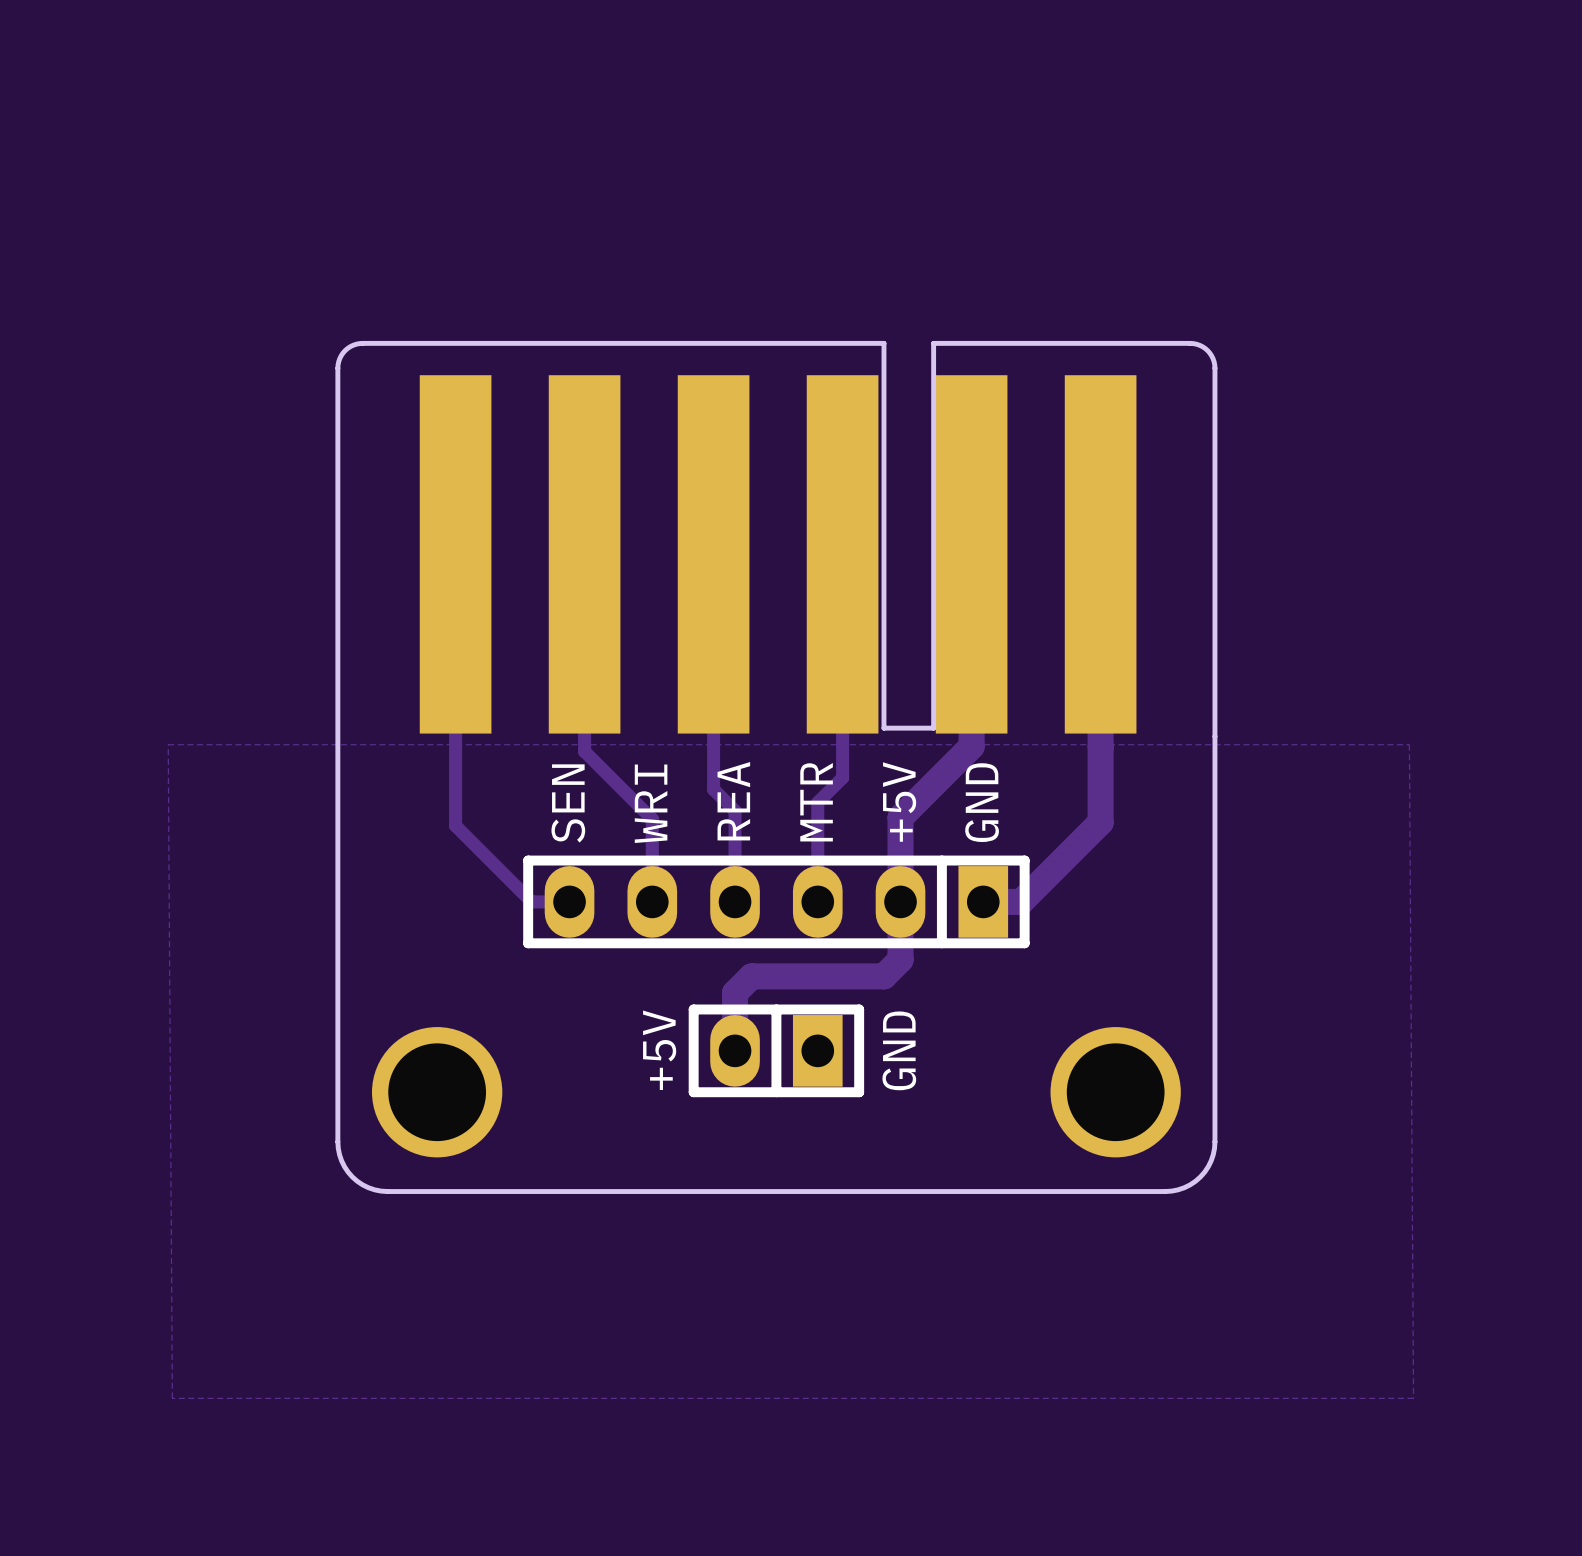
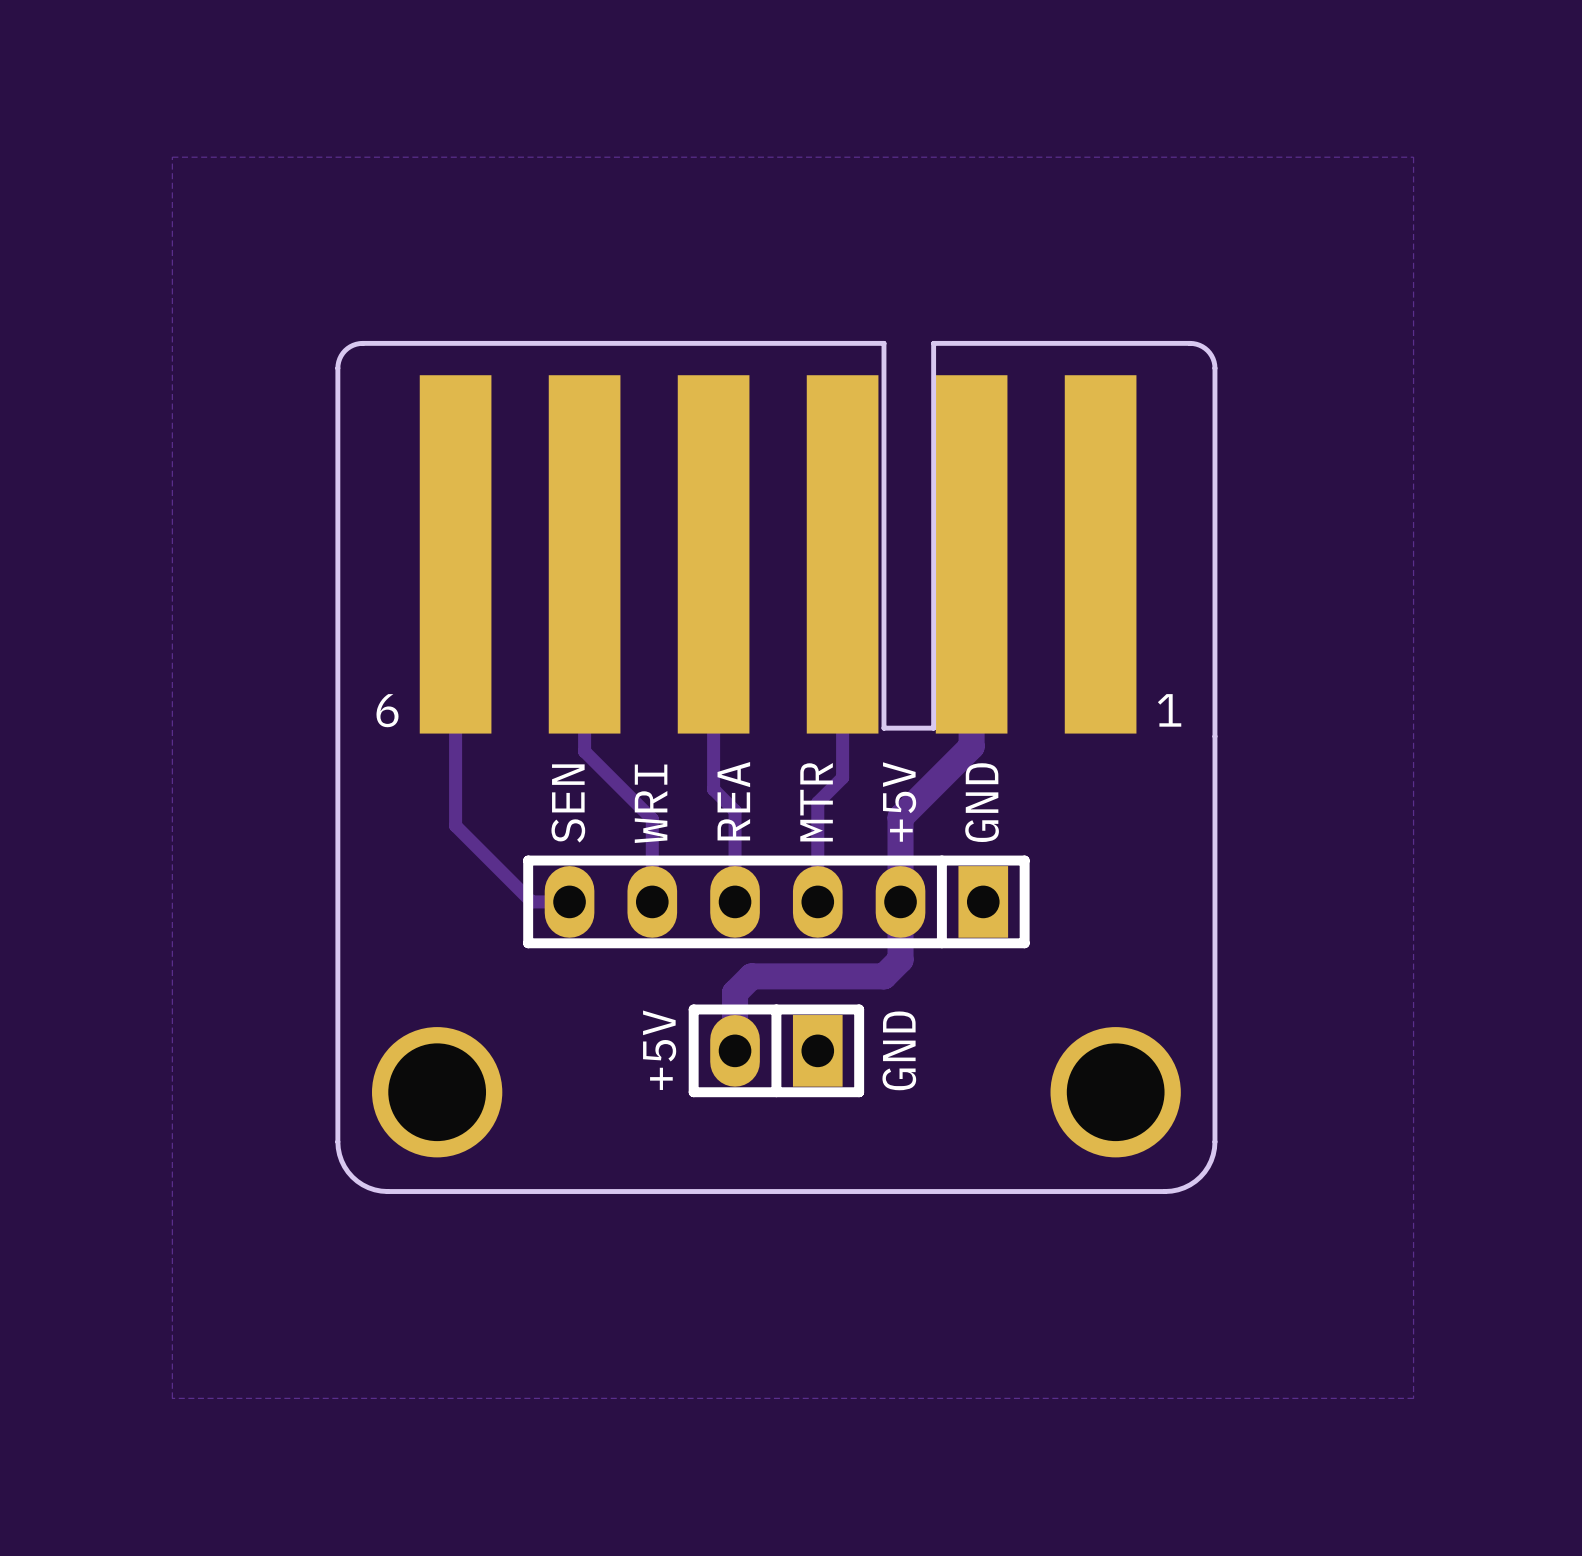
track: (1100, 554) (1100, 822) (1021, 901) (983, 901) -> none
text: none -> 6 (387, 710)
text: none -> 1 (1169, 710)
zone outline: (172, 1398) (168, 744) (1409, 744) (1413, 1398) -> (172, 1398) (172, 157) (1413, 157) (1413, 1398)

